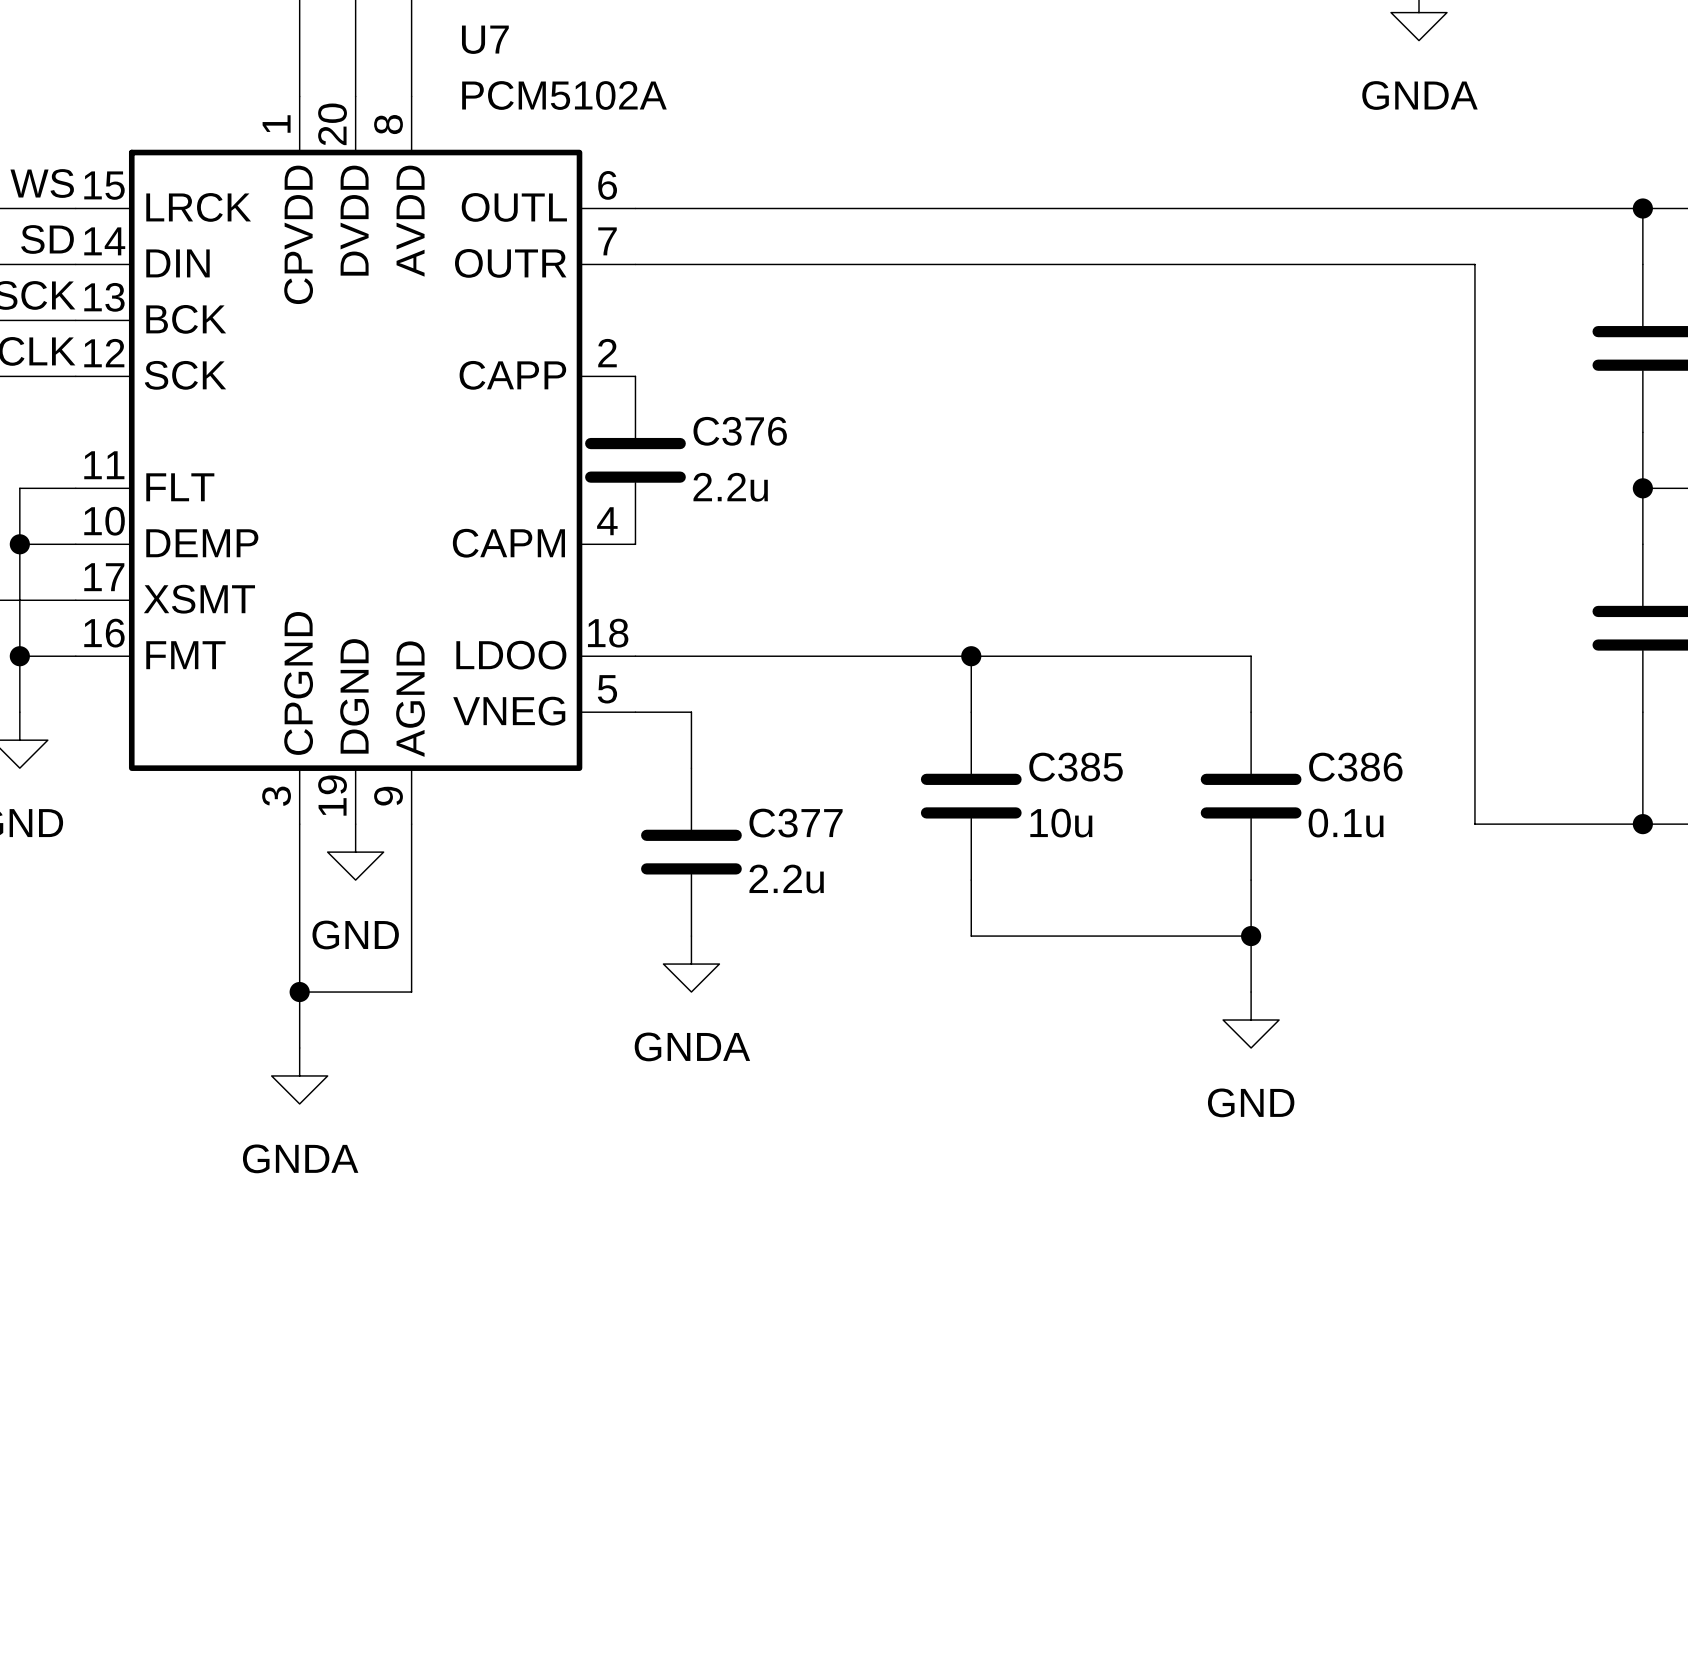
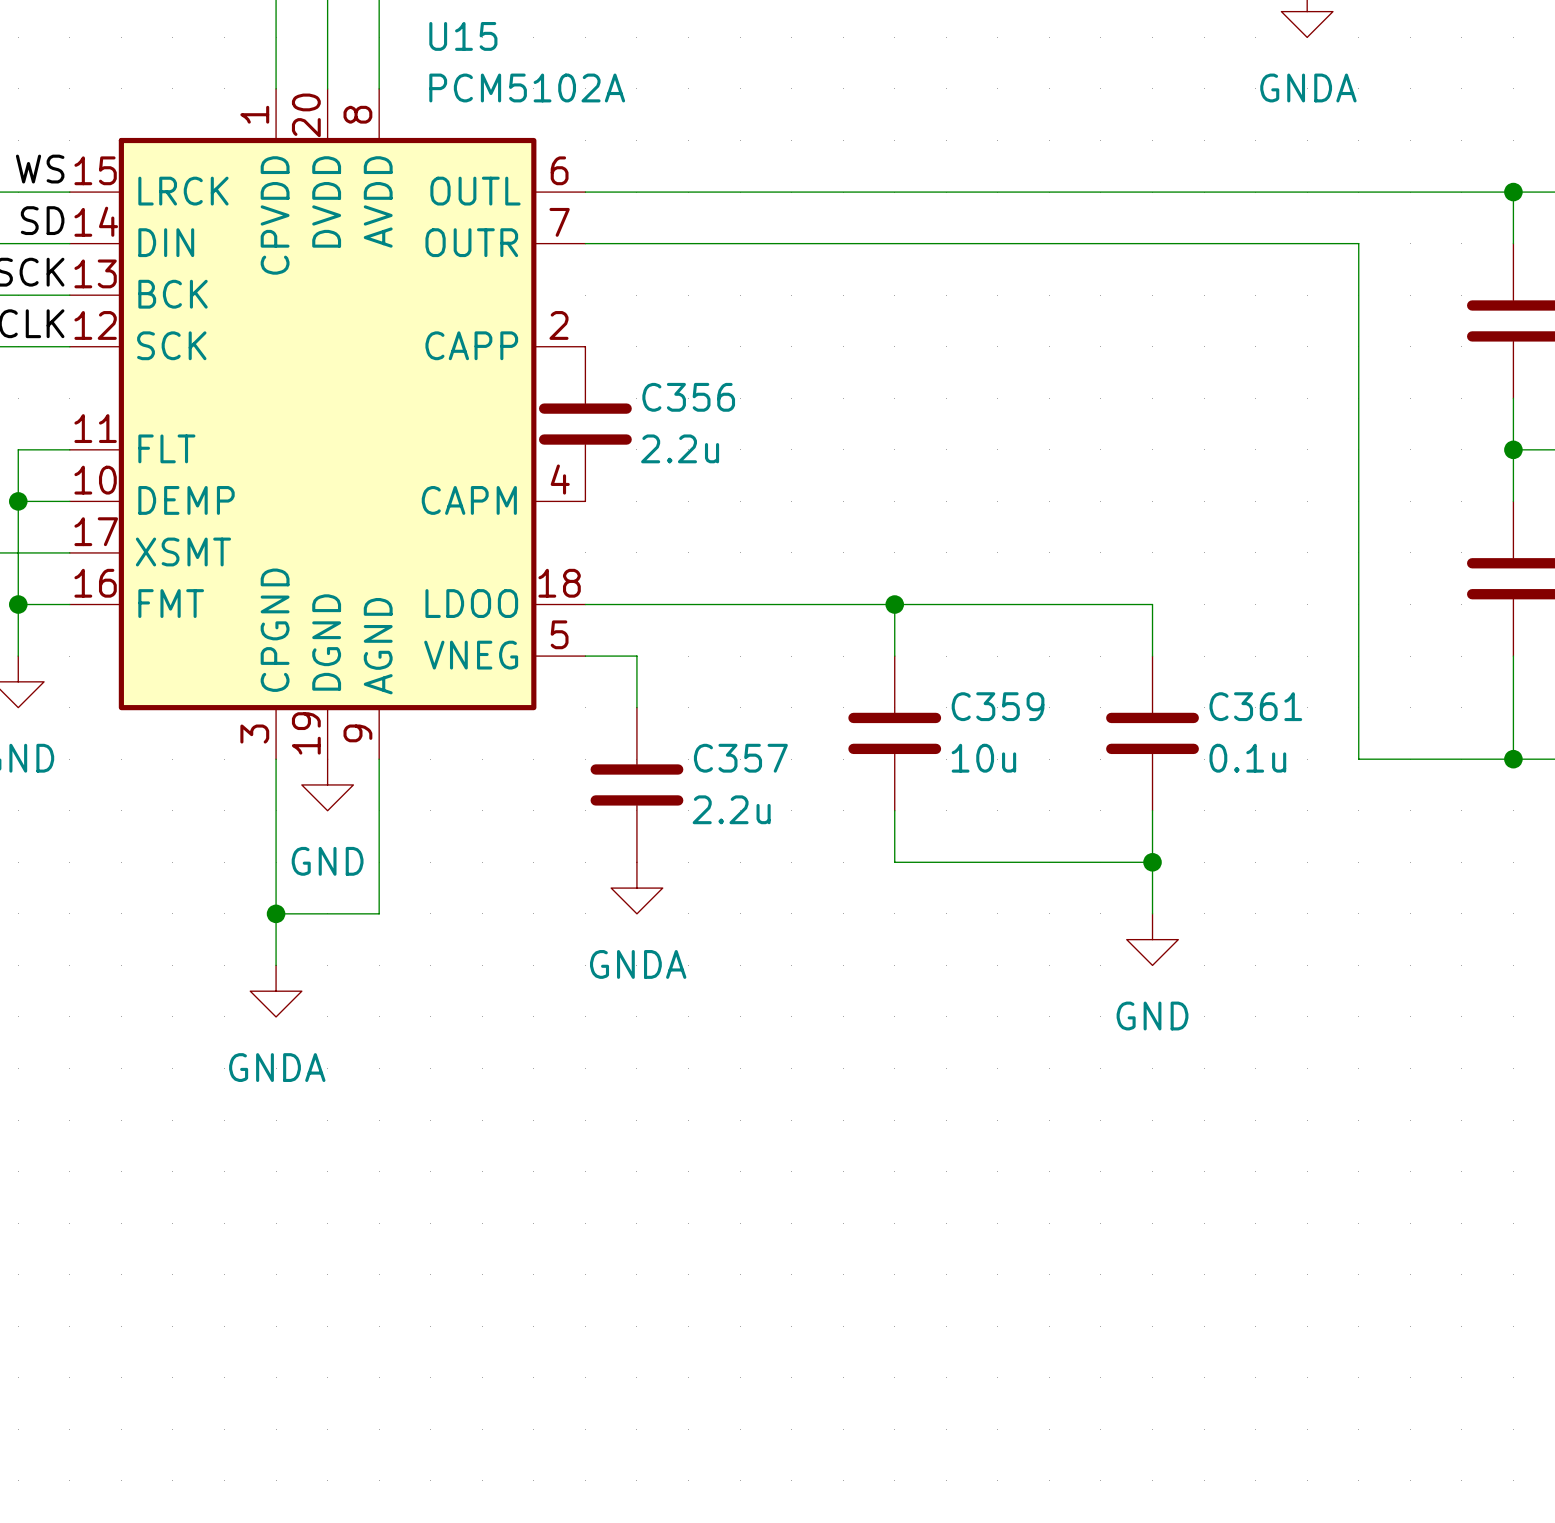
U7 name: U7 (485, 39) -> U15 (463, 36)
C376 name: C376 (740, 431) -> C356 (688, 397)
C385 name: C385 (1076, 767) -> C359 (998, 706)
C386 name: C386 (1355, 767) -> C361 (1255, 706)
C377 name: C377 (796, 823) -> C357 (740, 758)

